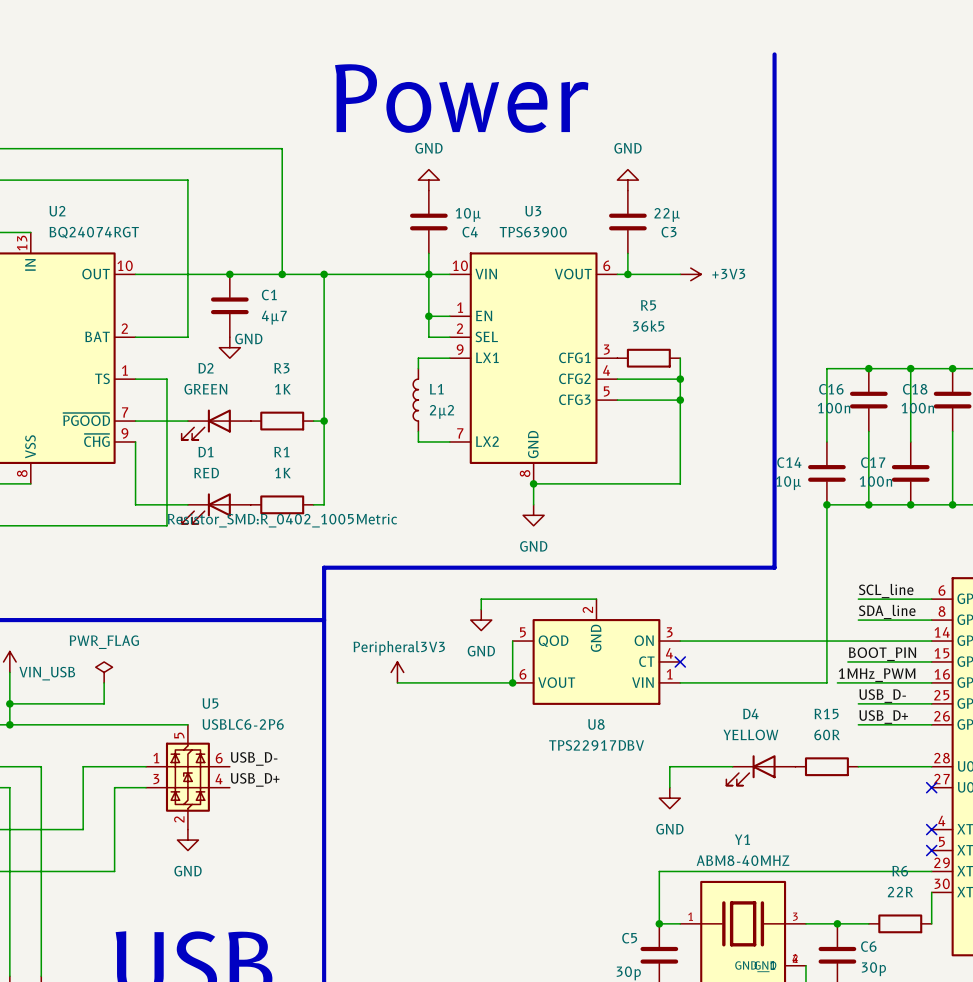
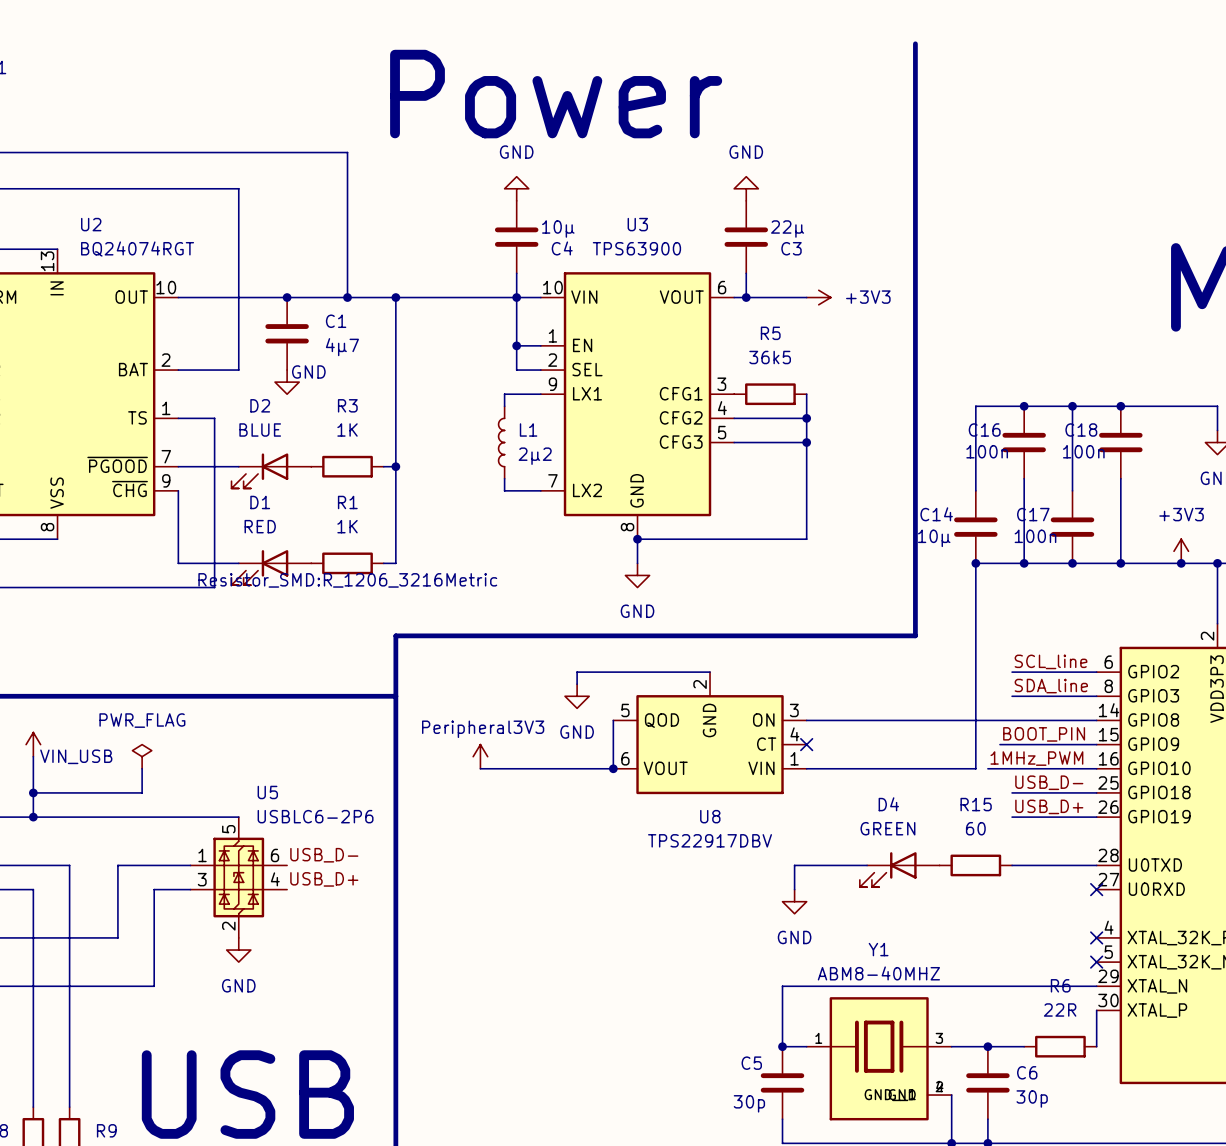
D2 value: GREEN (205, 389) -> BLUE (260, 430)
R1 text: Resistor_SMD:R_0402_1005Metric (282, 520) -> Resistor_SMD:R_1206_3216Metric (347, 580)
D4 value: YELLOW (750, 734) -> GREEN (887, 828)
R15 value: 60R (827, 734) -> 60 (975, 828)

